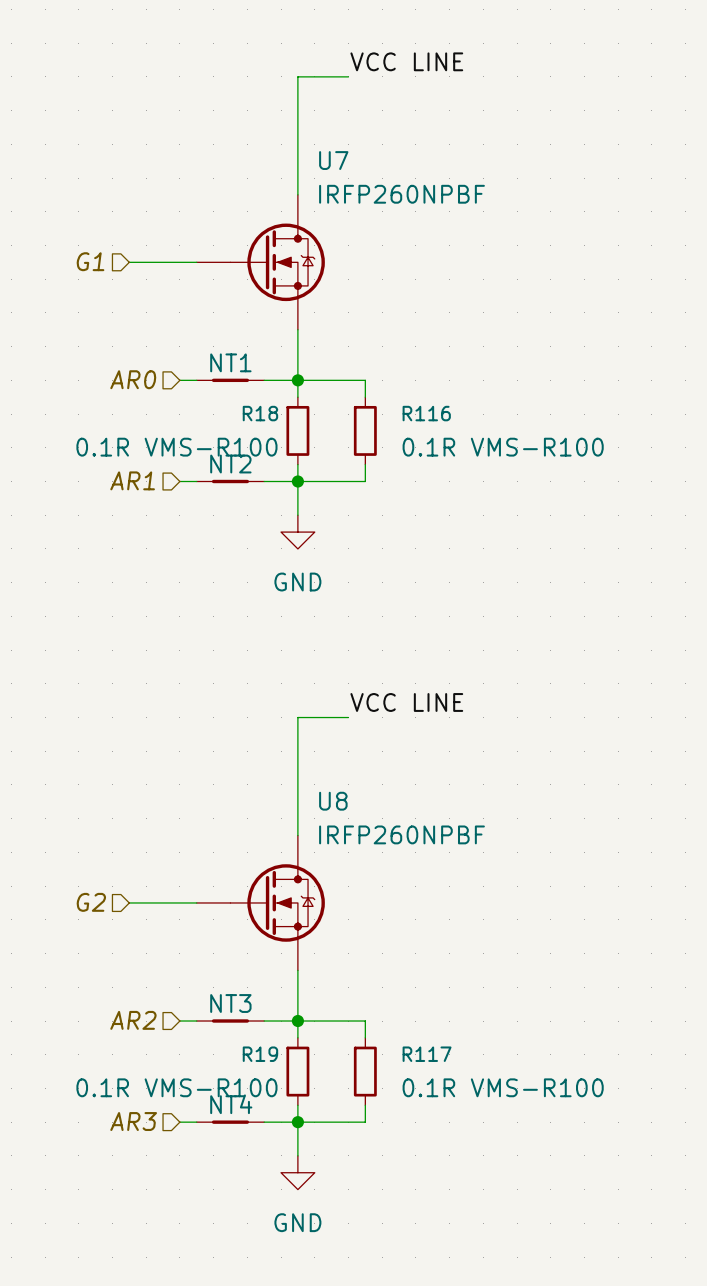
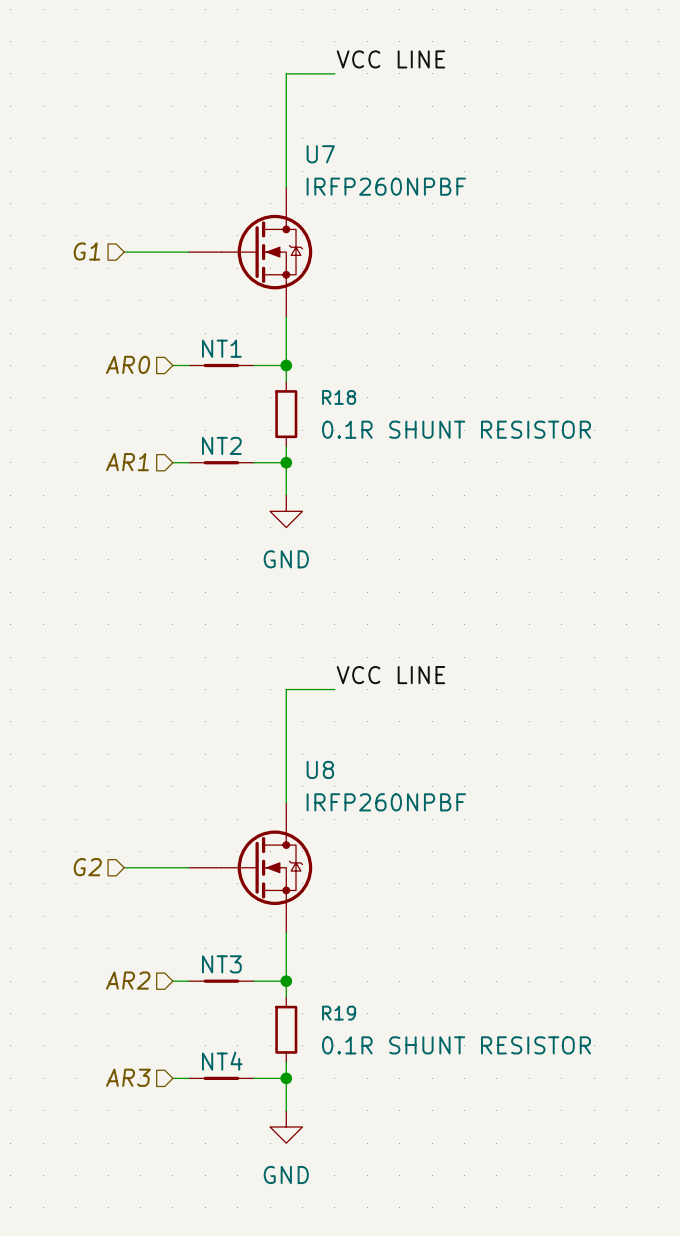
wire: (297, 380) (365, 380) (365, 397) -> none
R18 name position: R18 (260, 413) -> R18 (339, 397)
R116: 0.1R VMS-R100 (365, 430) -> none
R18 value: 0.1R VMS-R100 (176, 447) -> 0.1R SHUNT RESISTOR (456, 429)
wire: (365, 464) (365, 481) (297, 481) -> none
wire: (297, 1021) (365, 1021) (365, 1037) -> none
R19 name position: R19 (260, 1054) -> R19 (339, 1013)
R117: 0.1R VMS-R100 (365, 1071) -> none
R19 value: 0.1R VMS-R100 (176, 1087) -> 0.1R SHUNT RESISTOR (456, 1045)
wire: (365, 1105) (365, 1122) (297, 1122) -> none

